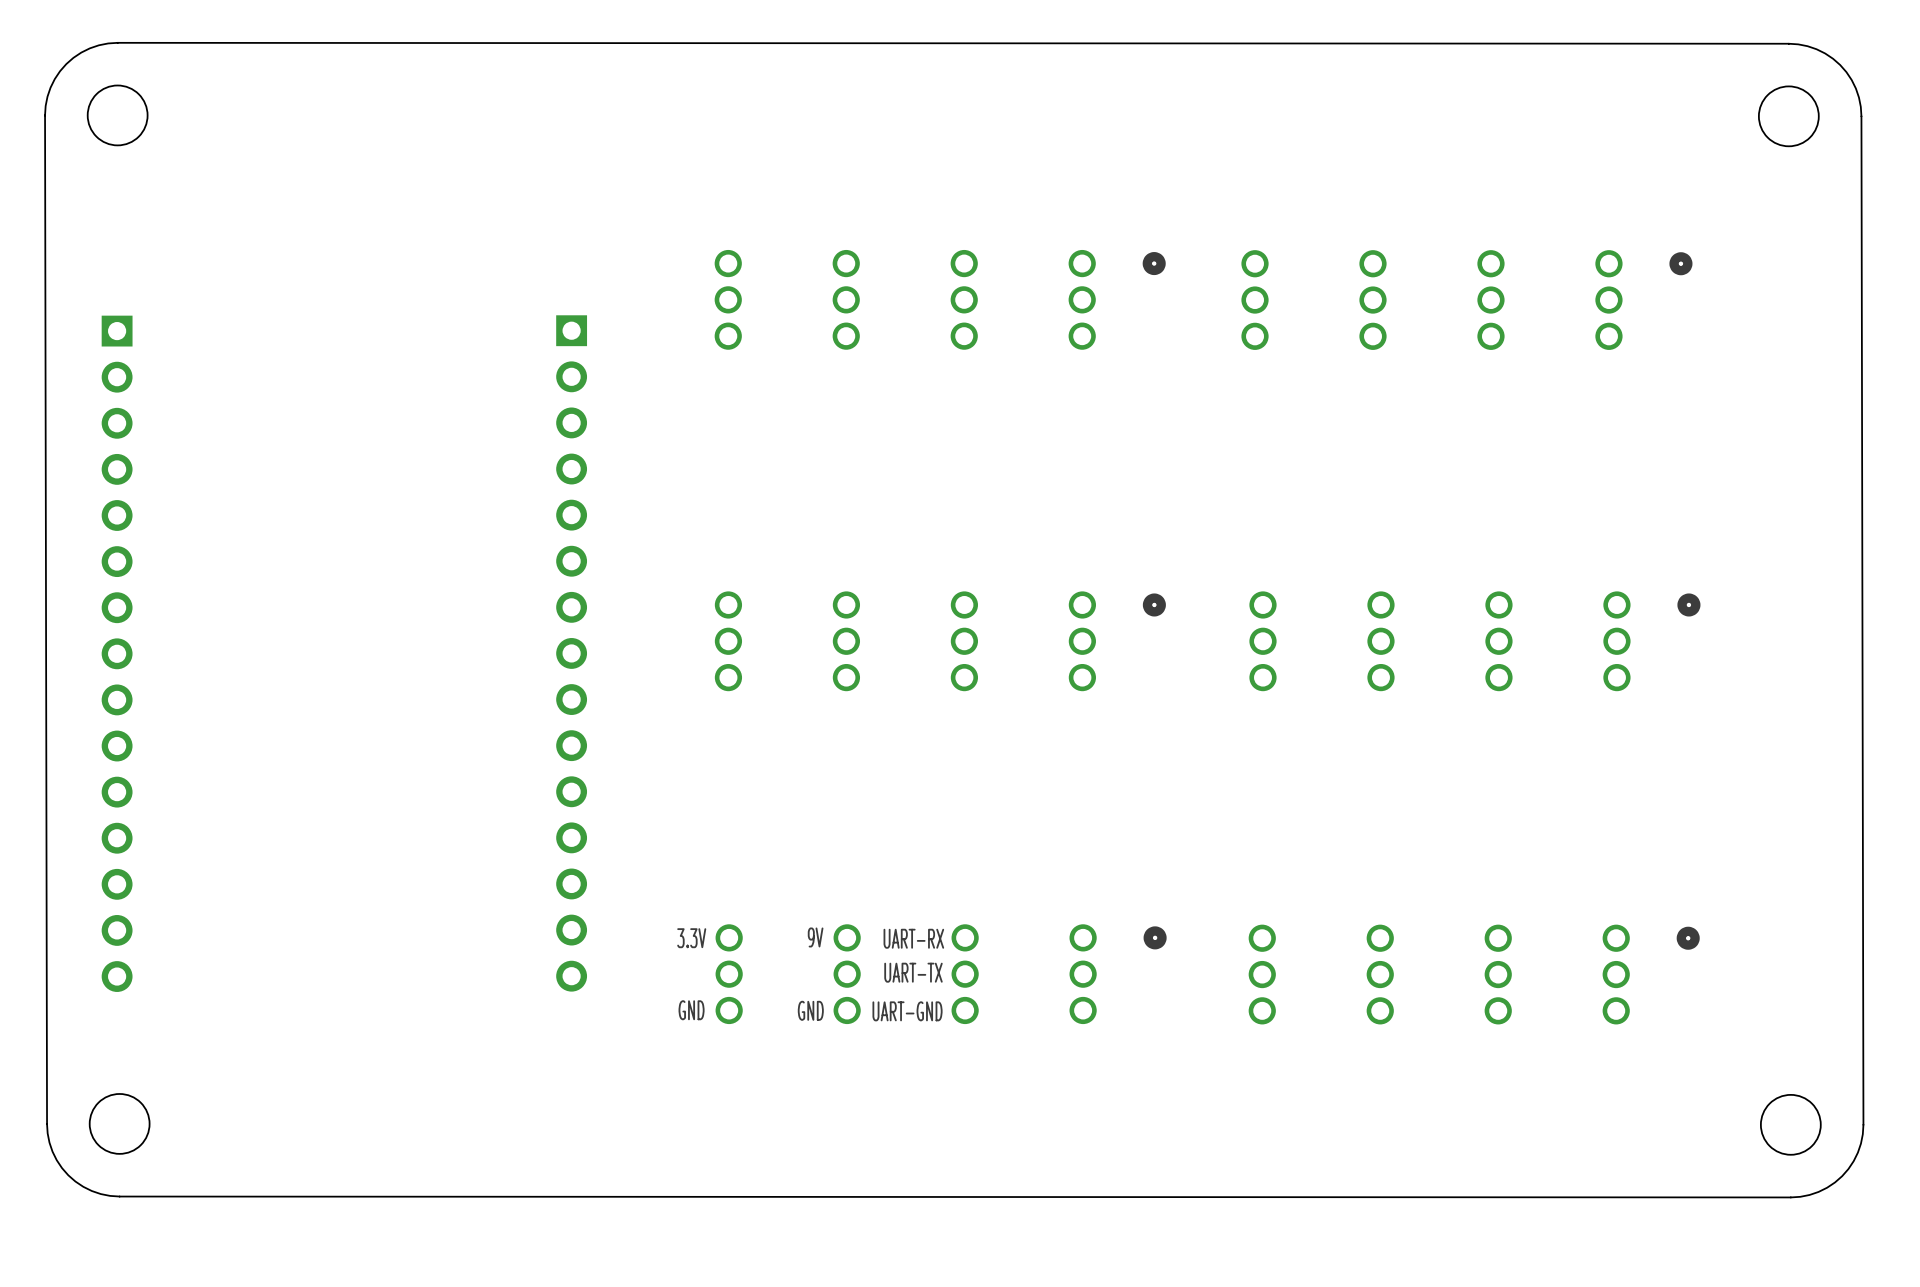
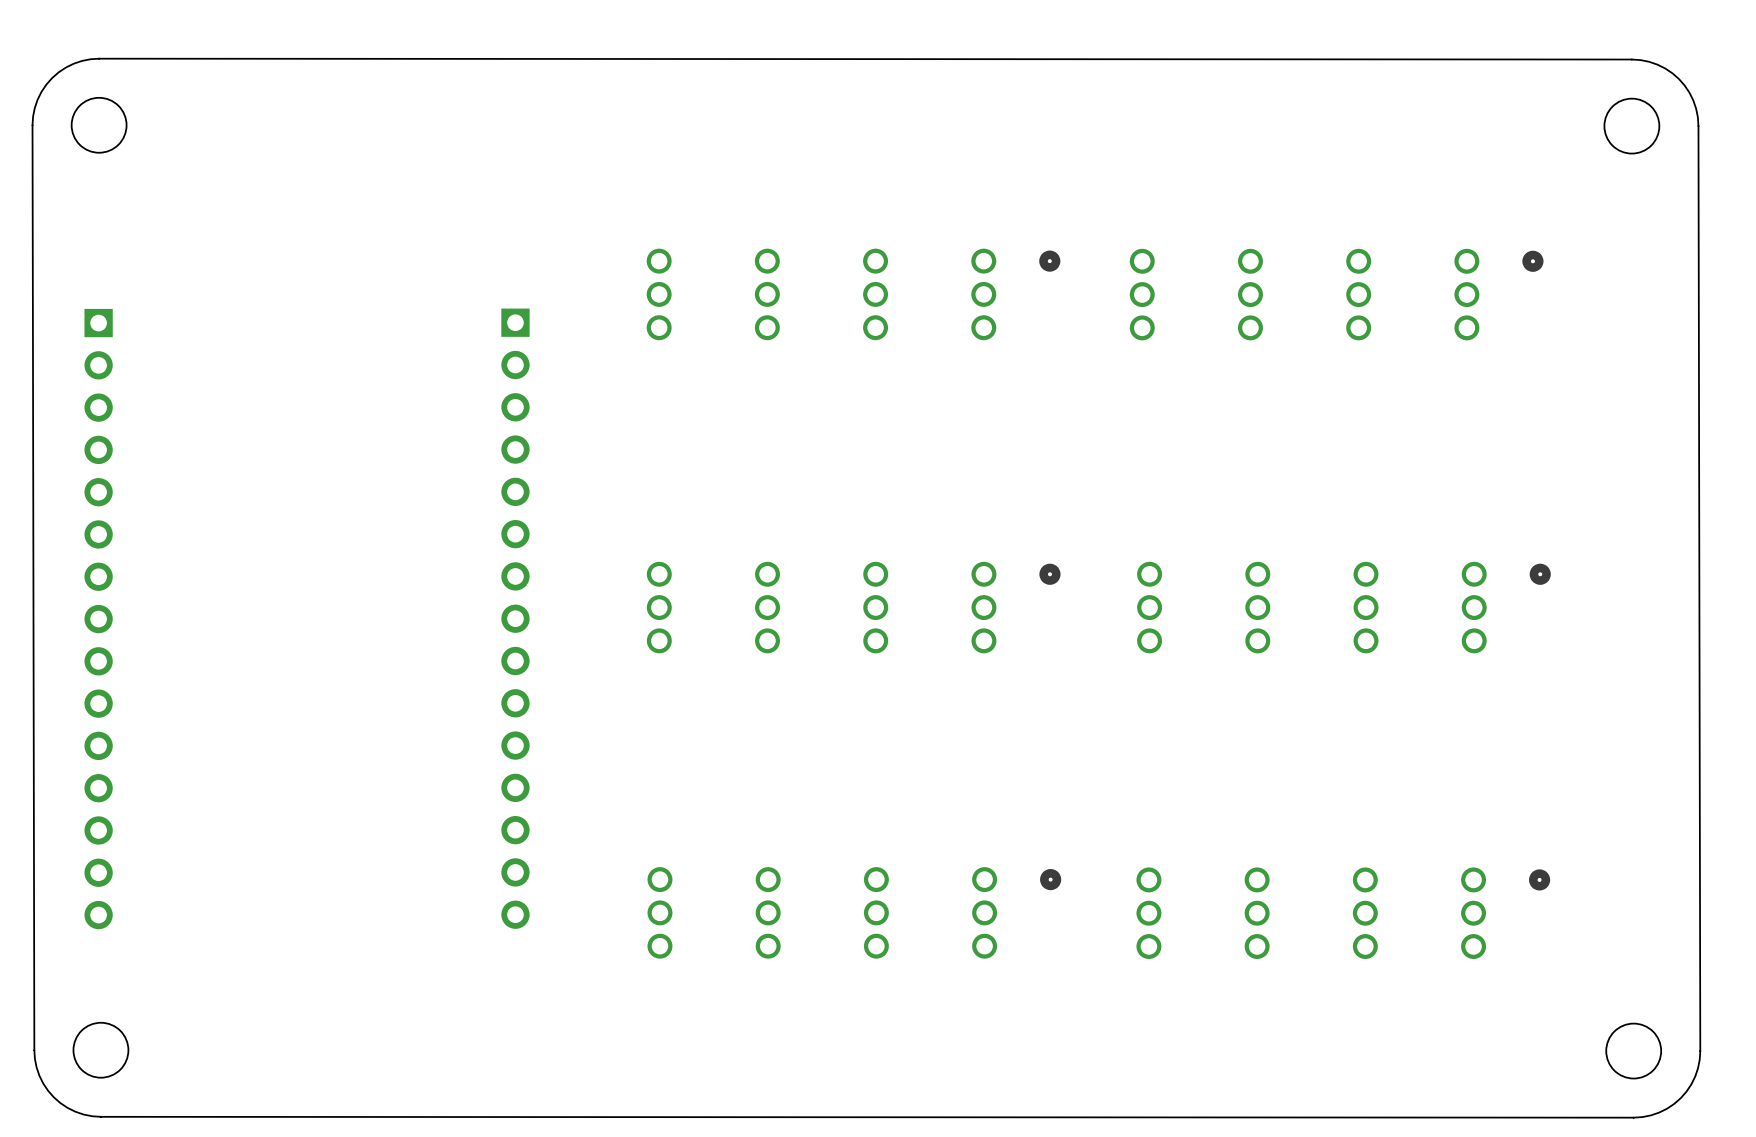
text: 9V (815, 937) -> none
text: 3.3V (691, 938) -> none
text: UART-RX (913, 938) -> none
text: UART-TX (913, 972) -> none
text: GND (691, 1010) -> none
text: GND (810, 1010) -> none
text: UART-GND (907, 1011) -> none

